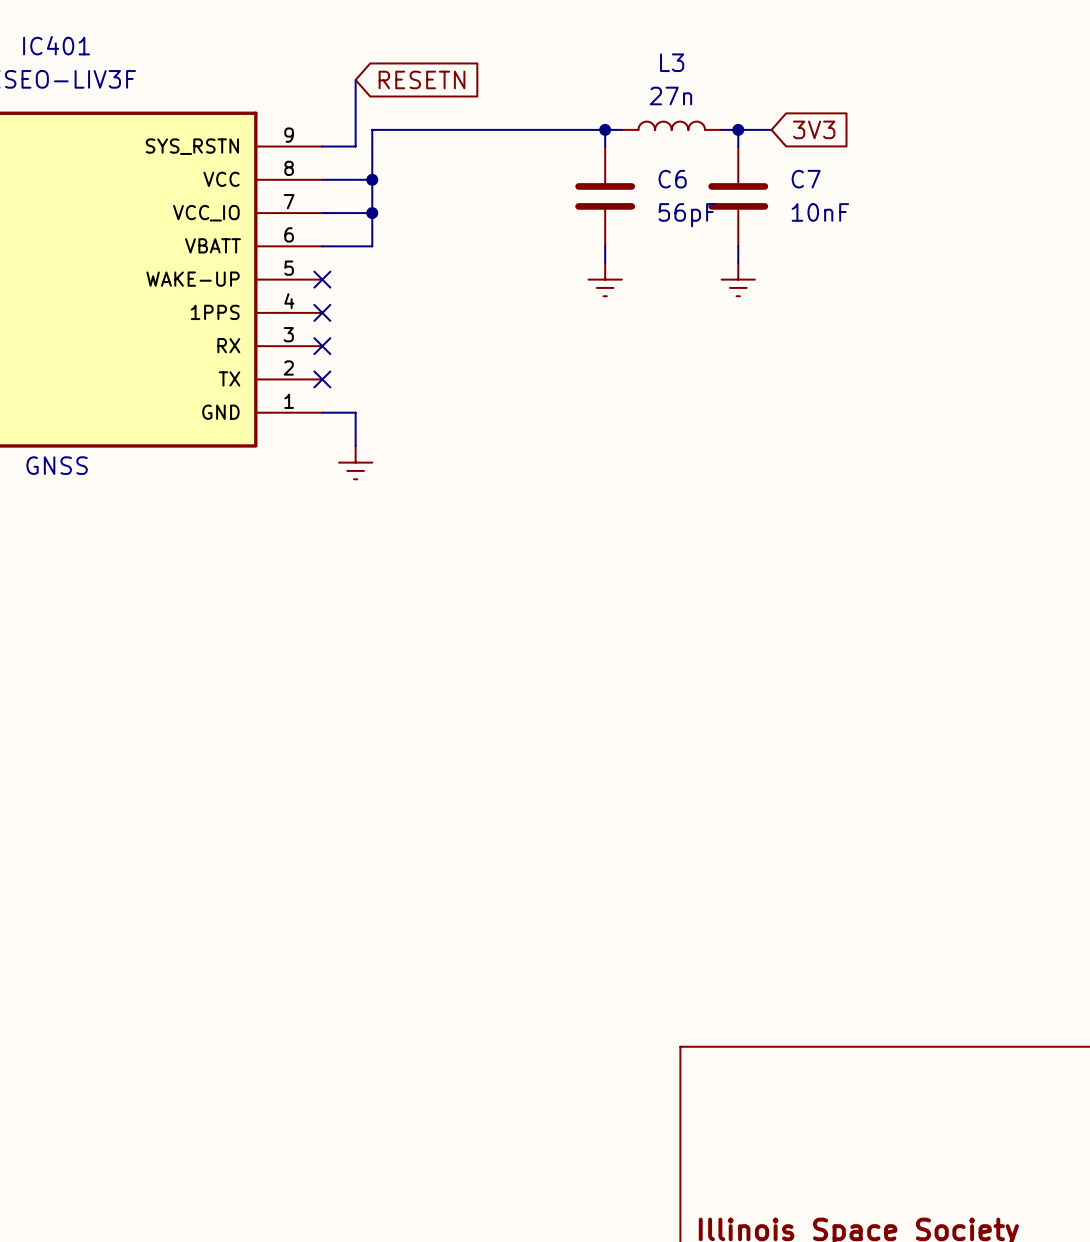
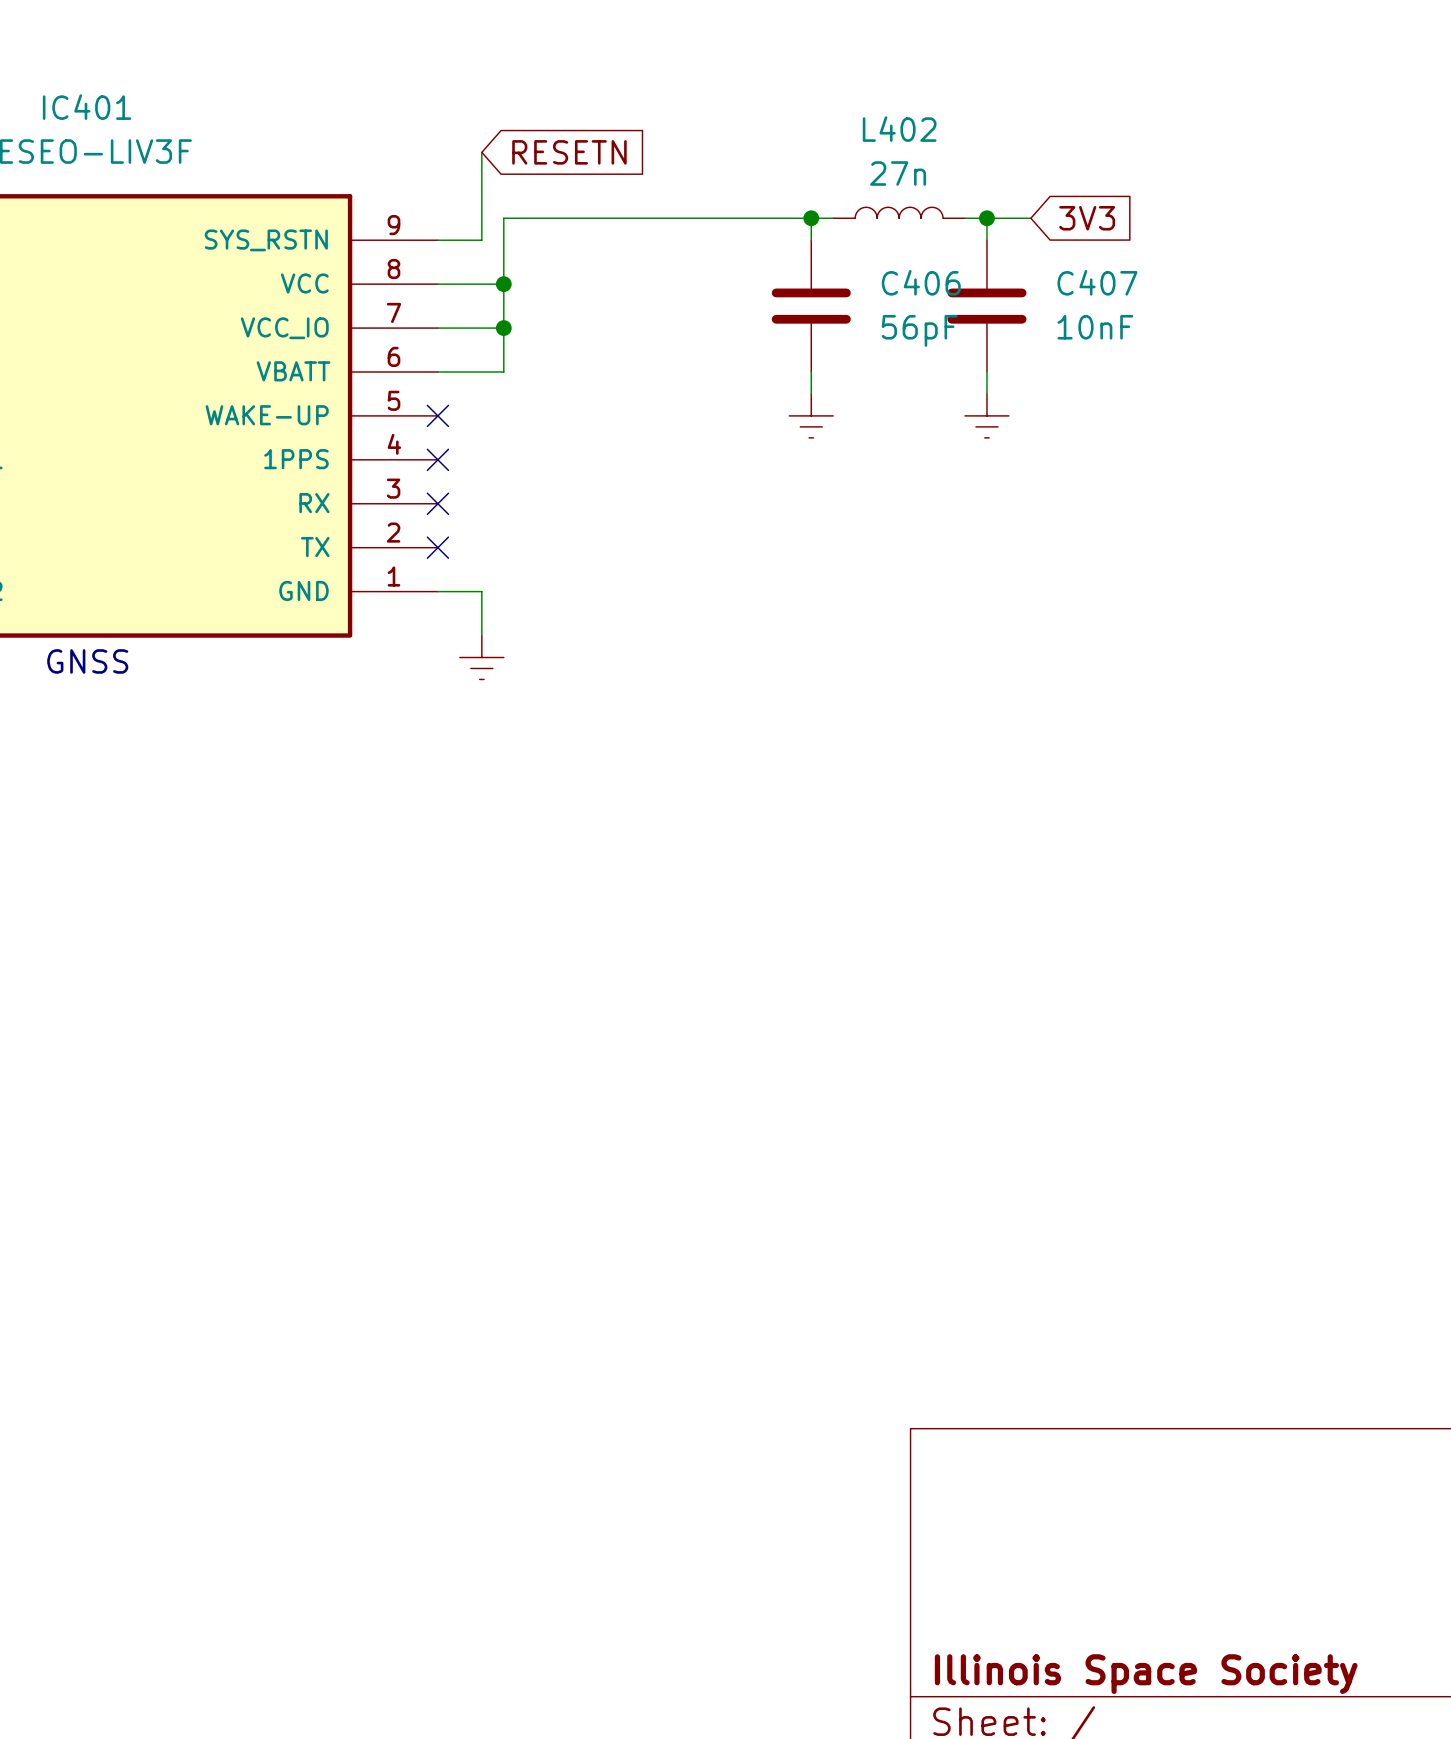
L3 name: L3 (672, 62) -> L402 (899, 129)
C6 name: C6 (672, 179) -> C406 (921, 282)
C7 name: C7 (806, 179) -> C407 (1097, 282)

